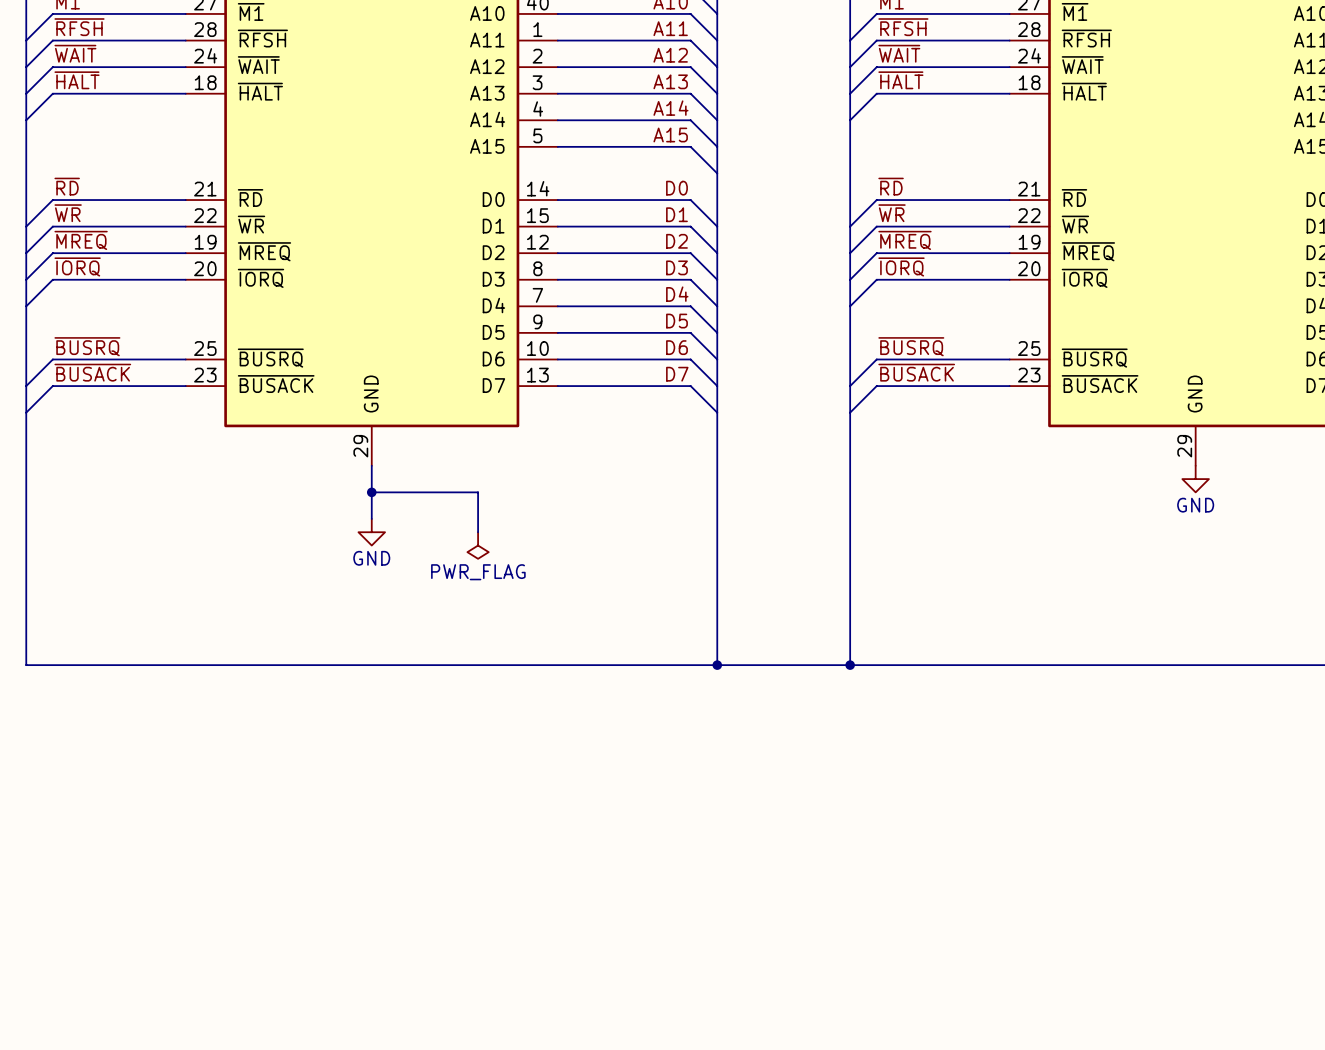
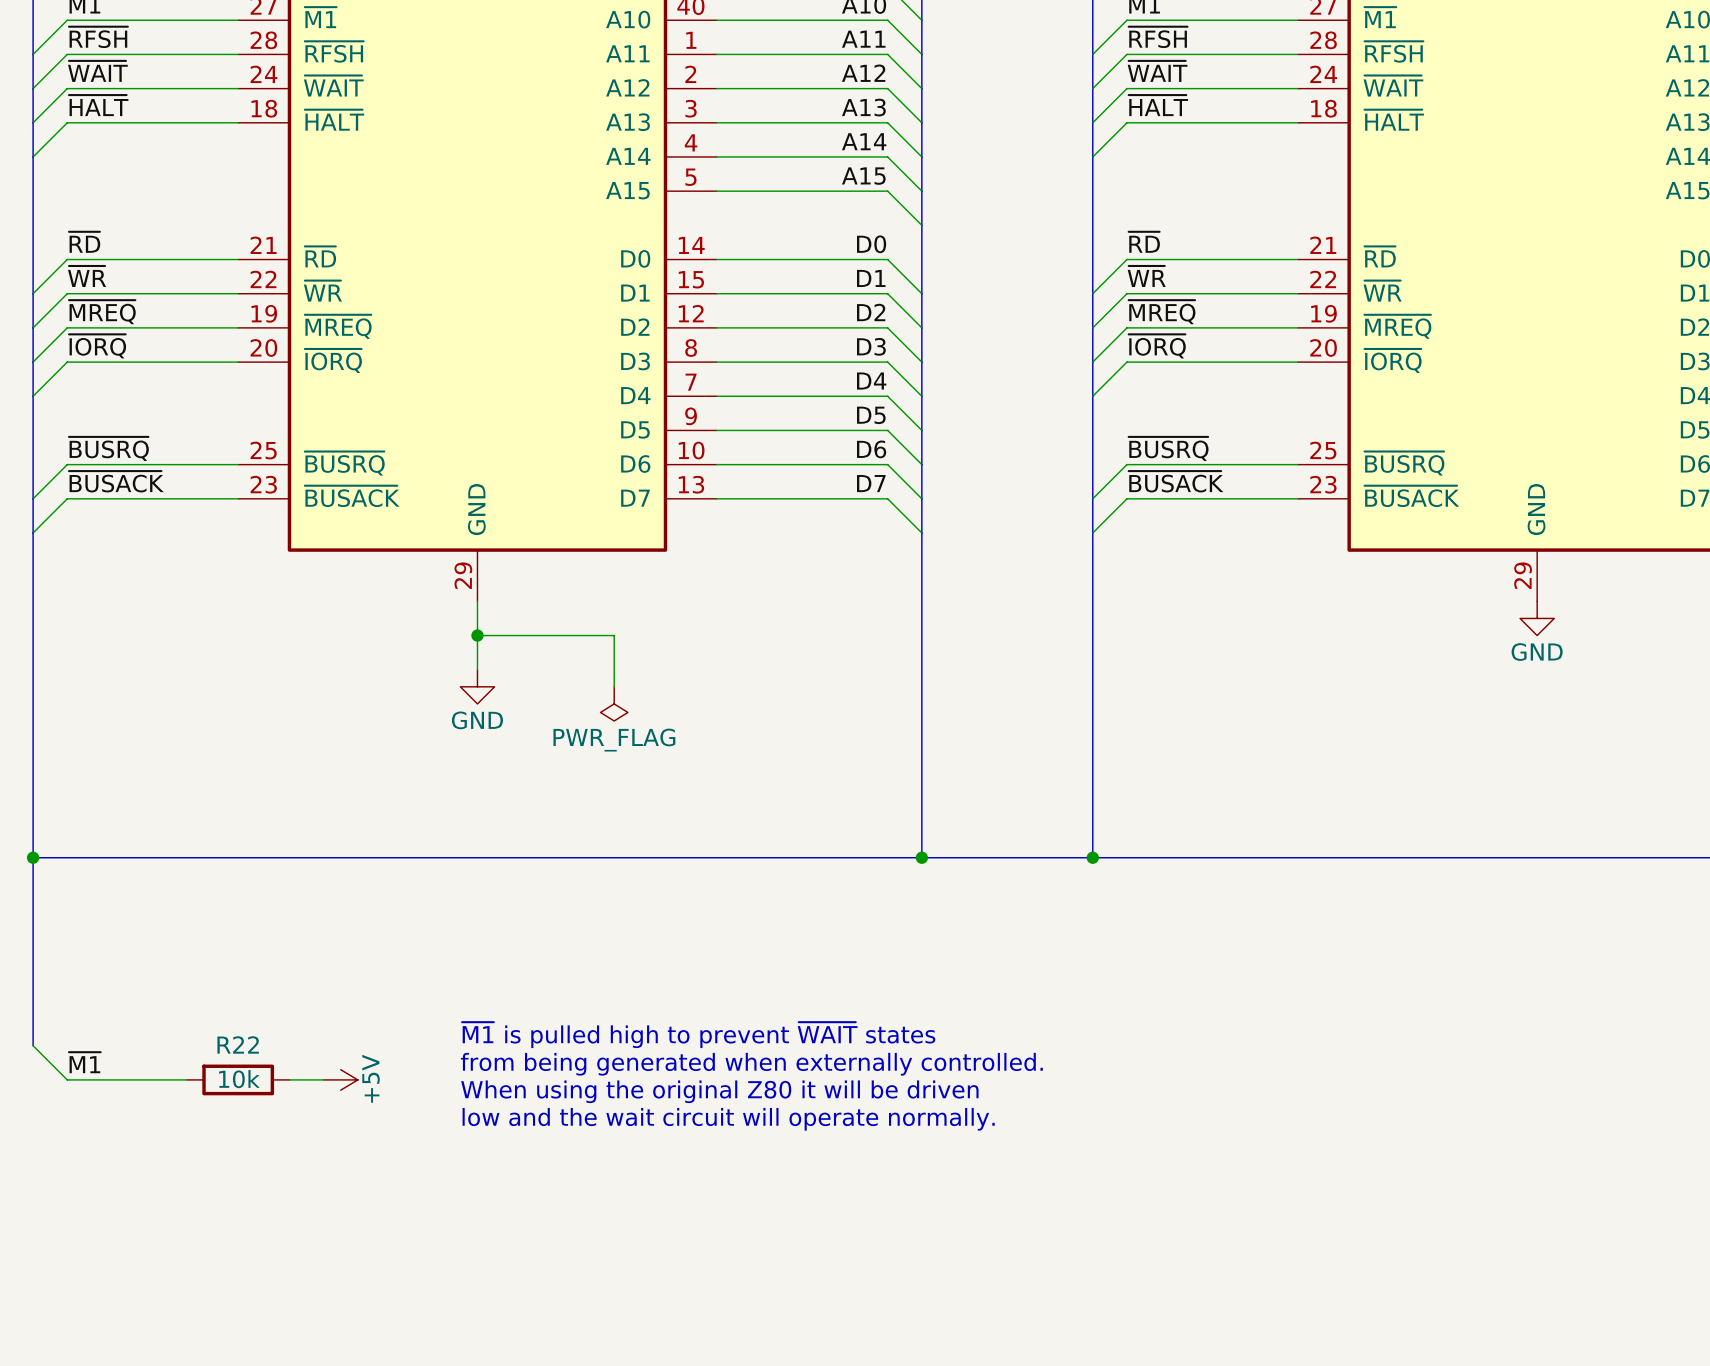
bus: none -> (33, 857) (33, 1045)
junction: none -> (33, 857)
text: none -> ~{M1} is pulled high to prevent ~{WAIT} states (698, 1035)
wire: none -> (33, 1045) (67, 1079) (186, 1079)
label: none -> ~{M1} (84, 1062)
text: none -> from being generated when externally controlled. (751, 1064)
R22: none -> 10k (238, 1079)
wire: none -> (289, 1079) (323, 1079)
power symbol: none -> +5V (340, 1079)
text: none -> When using the original Z80 it will be driven (719, 1091)
text: none -> low and the wait circuit will operate normally. (728, 1119)

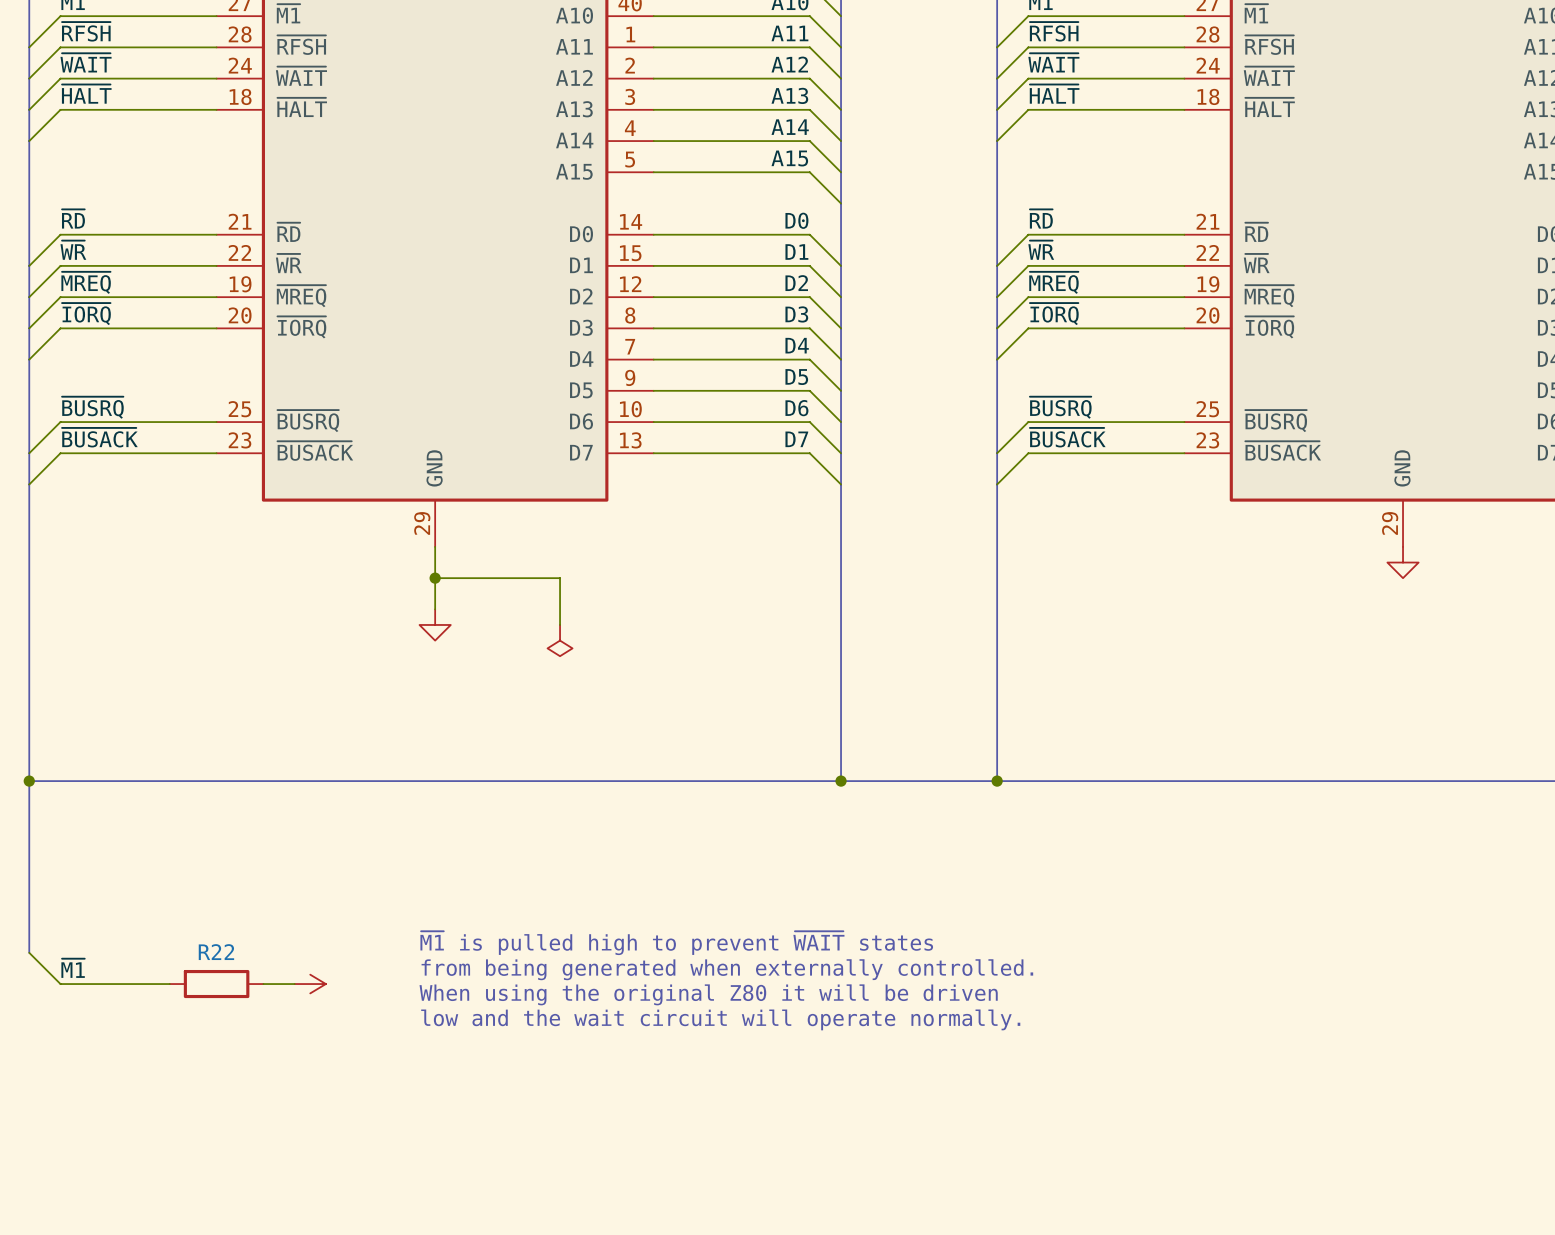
power symbol text: GND (1537, 652) -> none
power symbol text: GND (477, 720) -> none
power symbol text: PWR_FLAG (614, 740) -> none
power symbol text: +5V (371, 1078) -> none
R22 value: 10k (239, 1079) -> none

